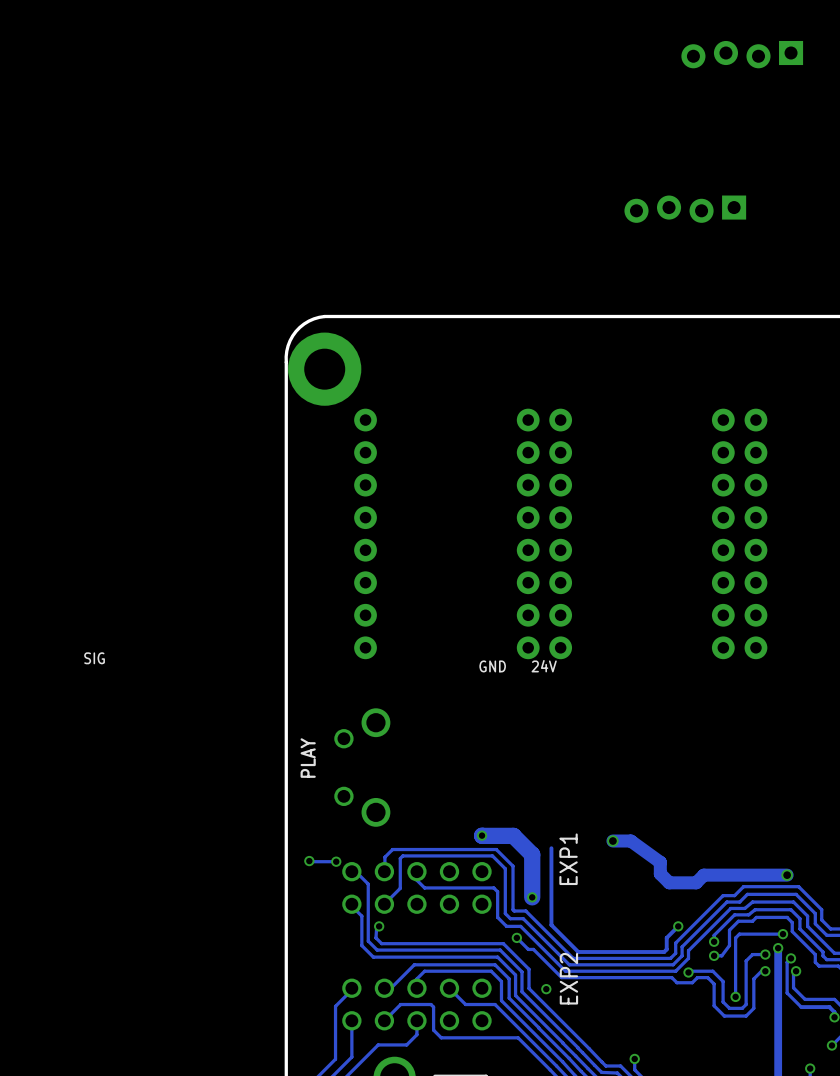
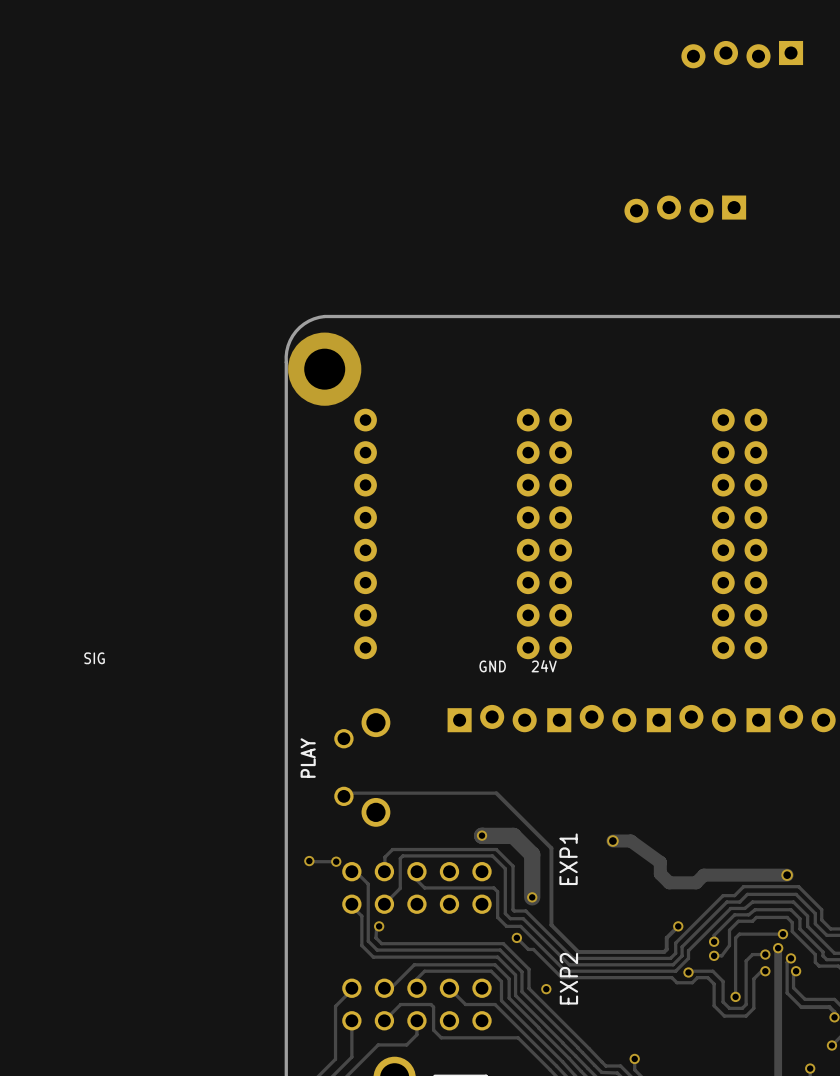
part: none -> (492, 718)
part: none -> (591, 718)
part: none -> (691, 718)
part: none -> (791, 718)
track: none -> (343, 796) (347, 793) (496, 793) (551, 848)

